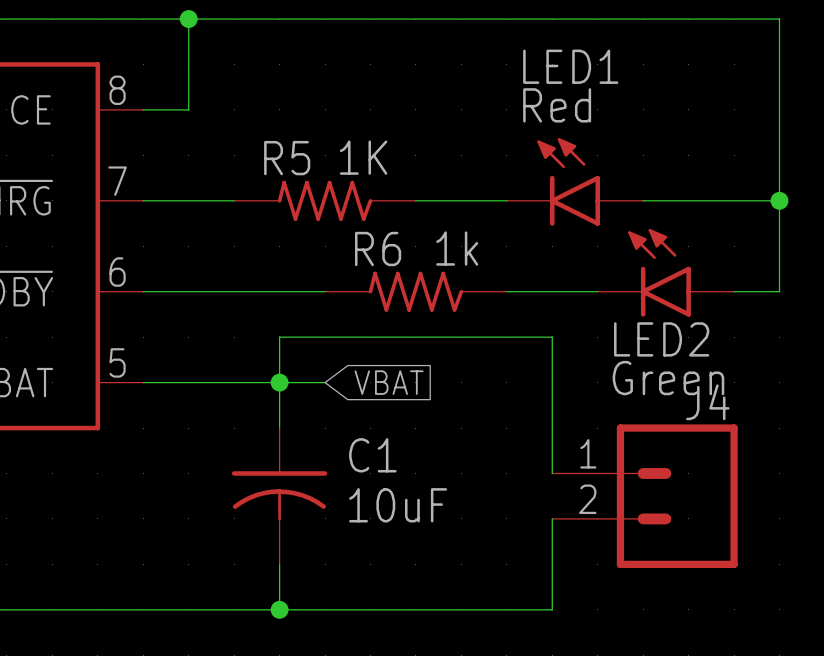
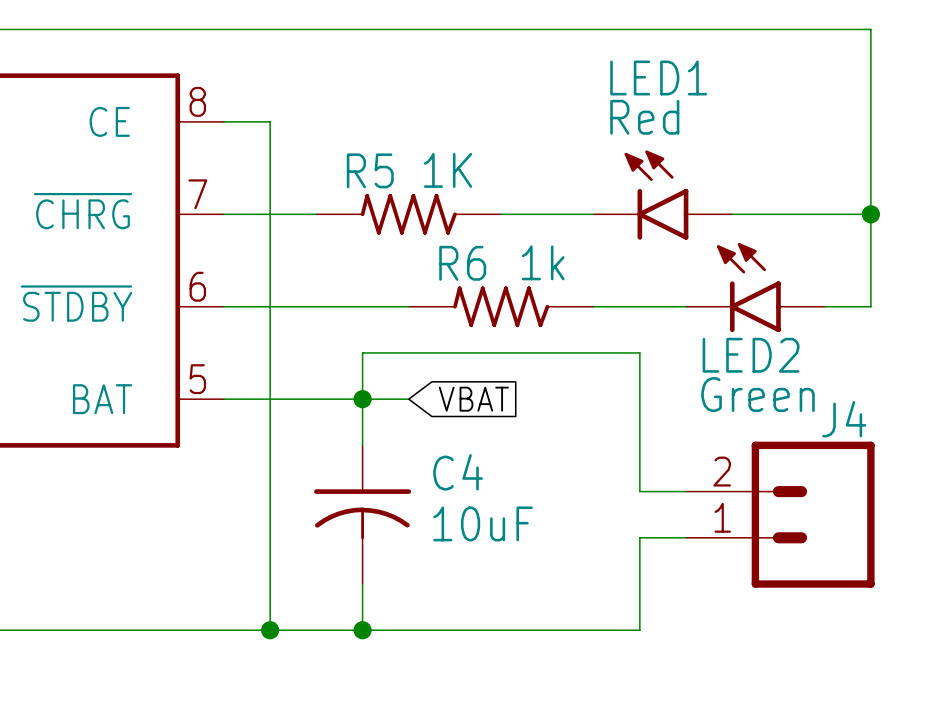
wire: (188, 19) (188, 109) -> (270, 630) (270, 121)
junction: (188, 19) -> none
C1 name: C1 (372, 455) -> C4 (458, 472)
J4 flip: as is (677, 496) -> up-down (813, 514)
junction: none -> (270, 630)

